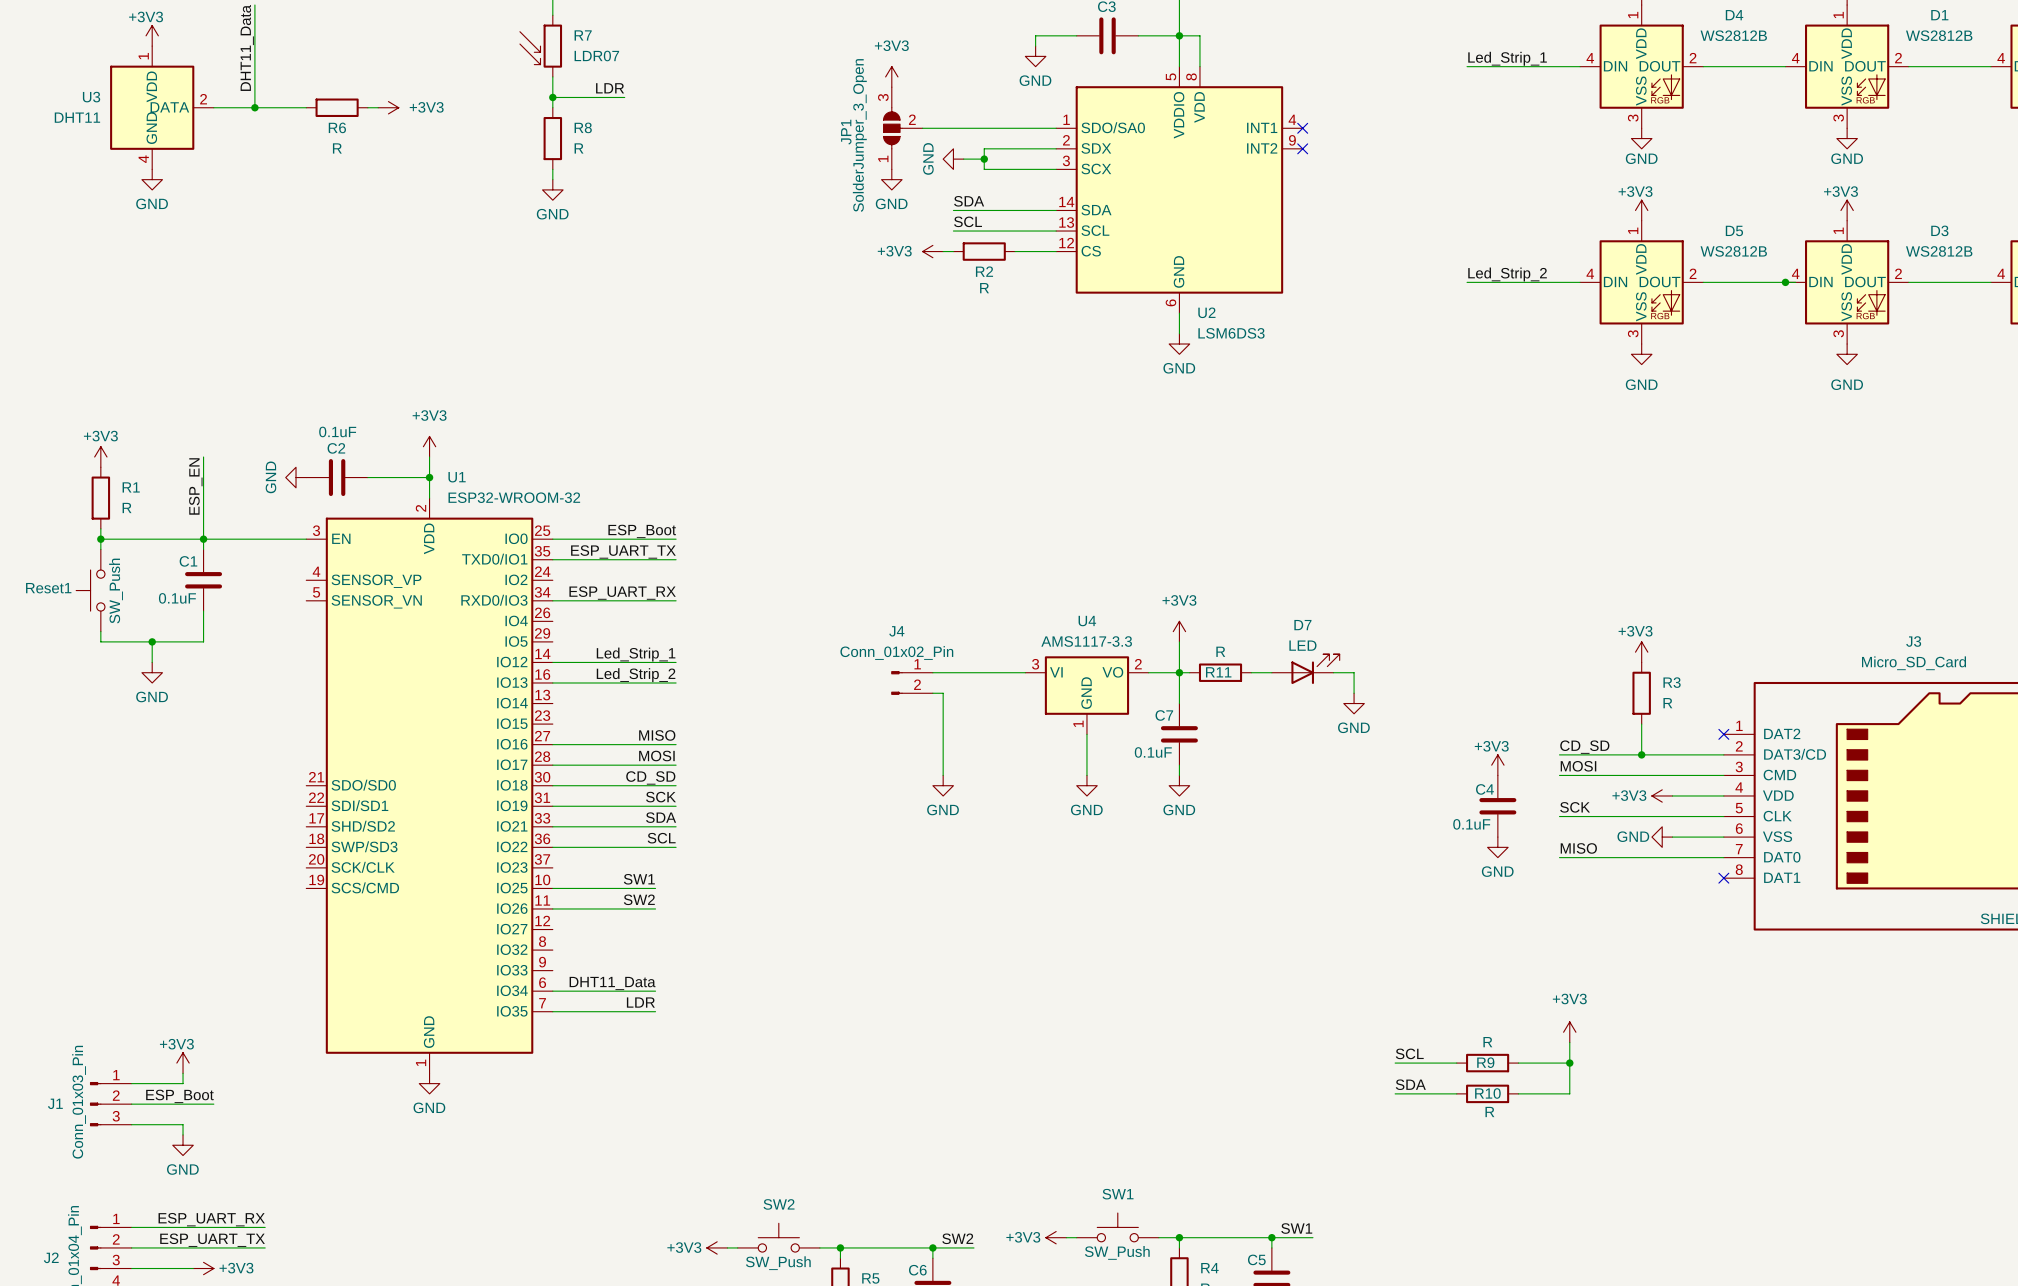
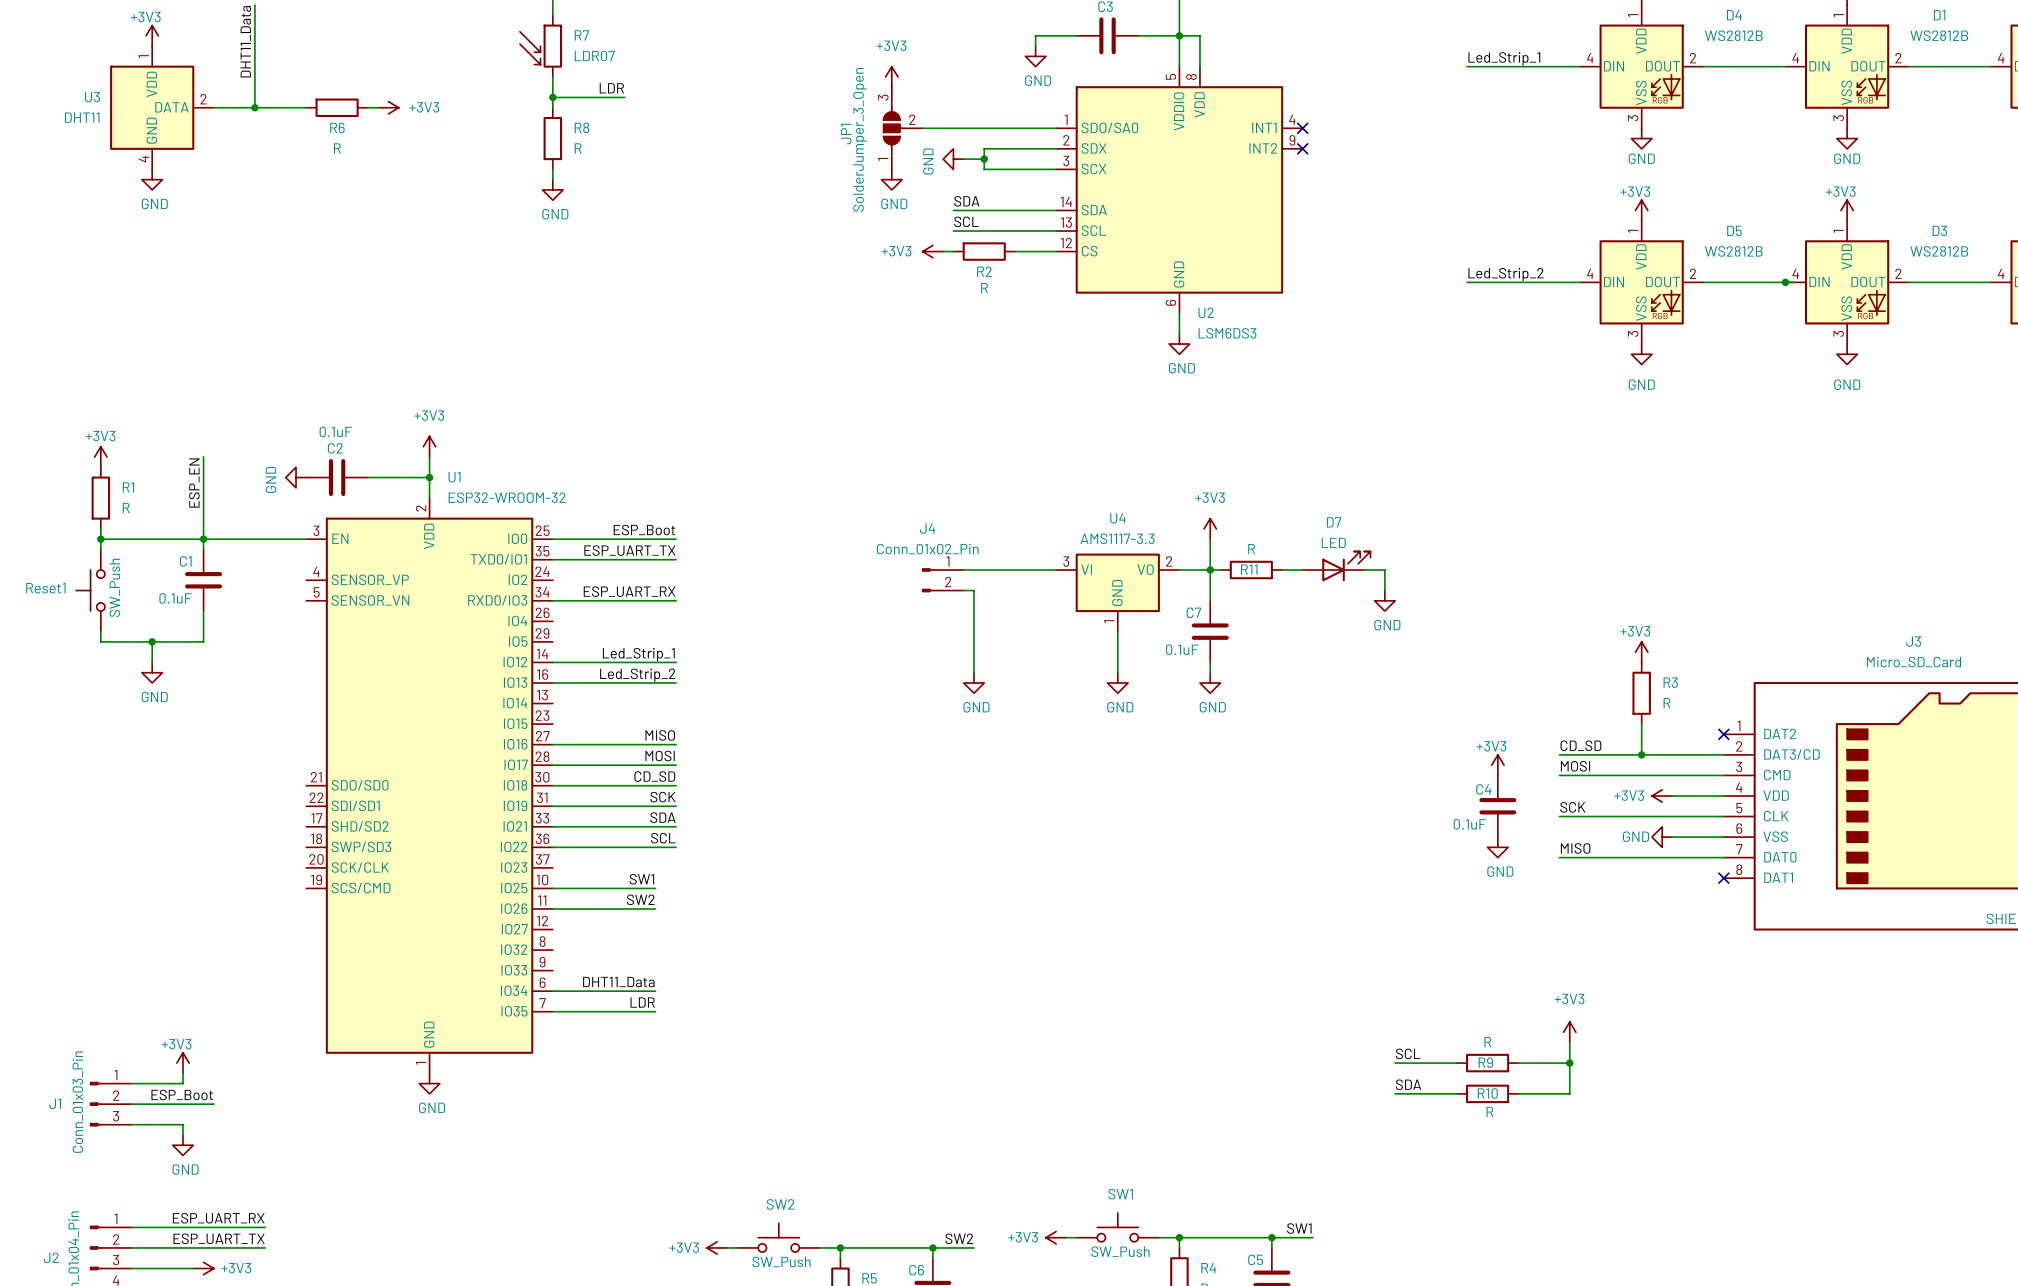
junction: none -> (1210, 570)
power symbol: none -> GND (1384, 600)
power symbol position: +3V3 (1179, 631) -> +3V3 (1210, 528)
wire: (1179, 641) (1179, 703) -> (1210, 539) (1210, 600)
D7 position: (1305, 669) -> (1336, 566)
wire: (932, 672) (1025, 672) -> (963, 570) (1056, 570)
wire: (1148, 672) (1189, 672) -> (1179, 570) (1220, 570)
junction: (1179, 672) -> none
R11 position: (1220, 672) -> (1251, 570)
wire: (1251, 672) (1271, 672) -> (1282, 570) (1302, 570)
wire: (1333, 672) (1354, 672) (1354, 693) -> (1364, 570) (1384, 570) (1384, 590)
J4 position: (912, 682) -> (942, 580)
power symbol: none -> GND (973, 682)
power symbol: none -> GND (1117, 682)
power symbol: none -> GND (1210, 682)
wire: (932, 693) (943, 693) (943, 775) -> (963, 590) (973, 590) (973, 672)
U4 position: (1086, 695) -> (1117, 592)
power symbol: GND (1354, 703) -> none
wire: (1086, 734) (1086, 775) -> (1117, 631) (1117, 672)
C7 position: (1179, 734) -> (1210, 631)
wire: (1179, 765) (1179, 775) -> (1210, 662) (1210, 672)
power symbol: GND (943, 785) -> none
power symbol: GND (1086, 785) -> none
power symbol: GND (1179, 785) -> none

